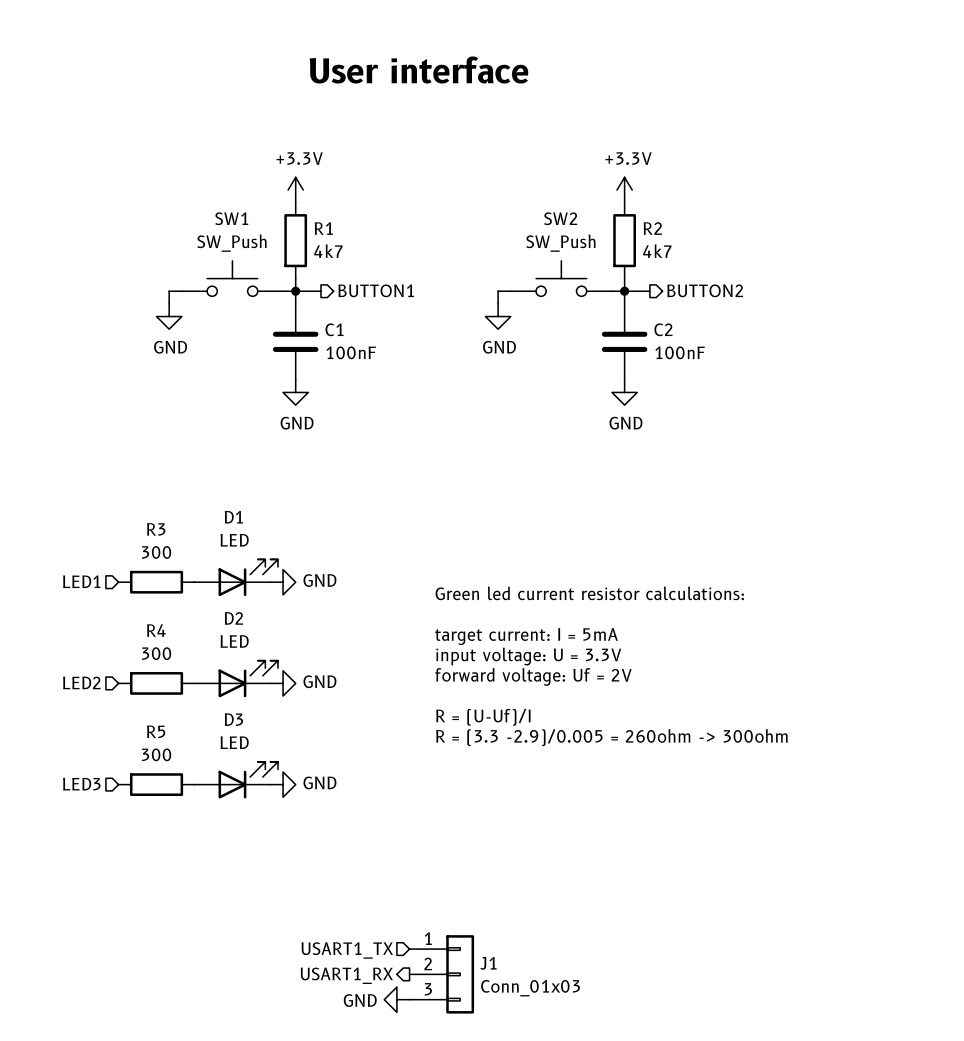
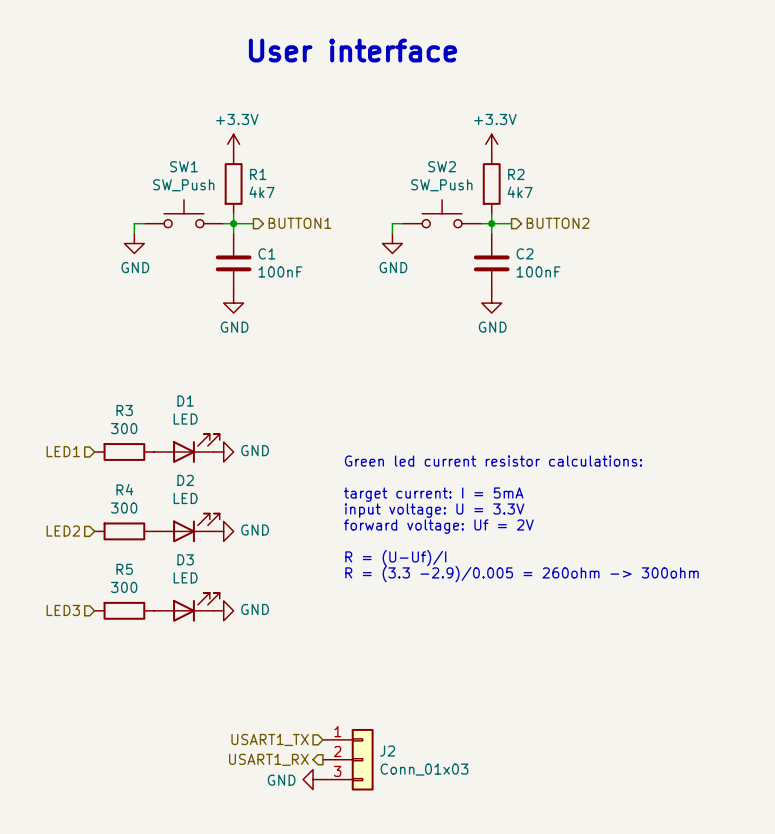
J1 name: J1 (488, 963) -> J2 (387, 751)

